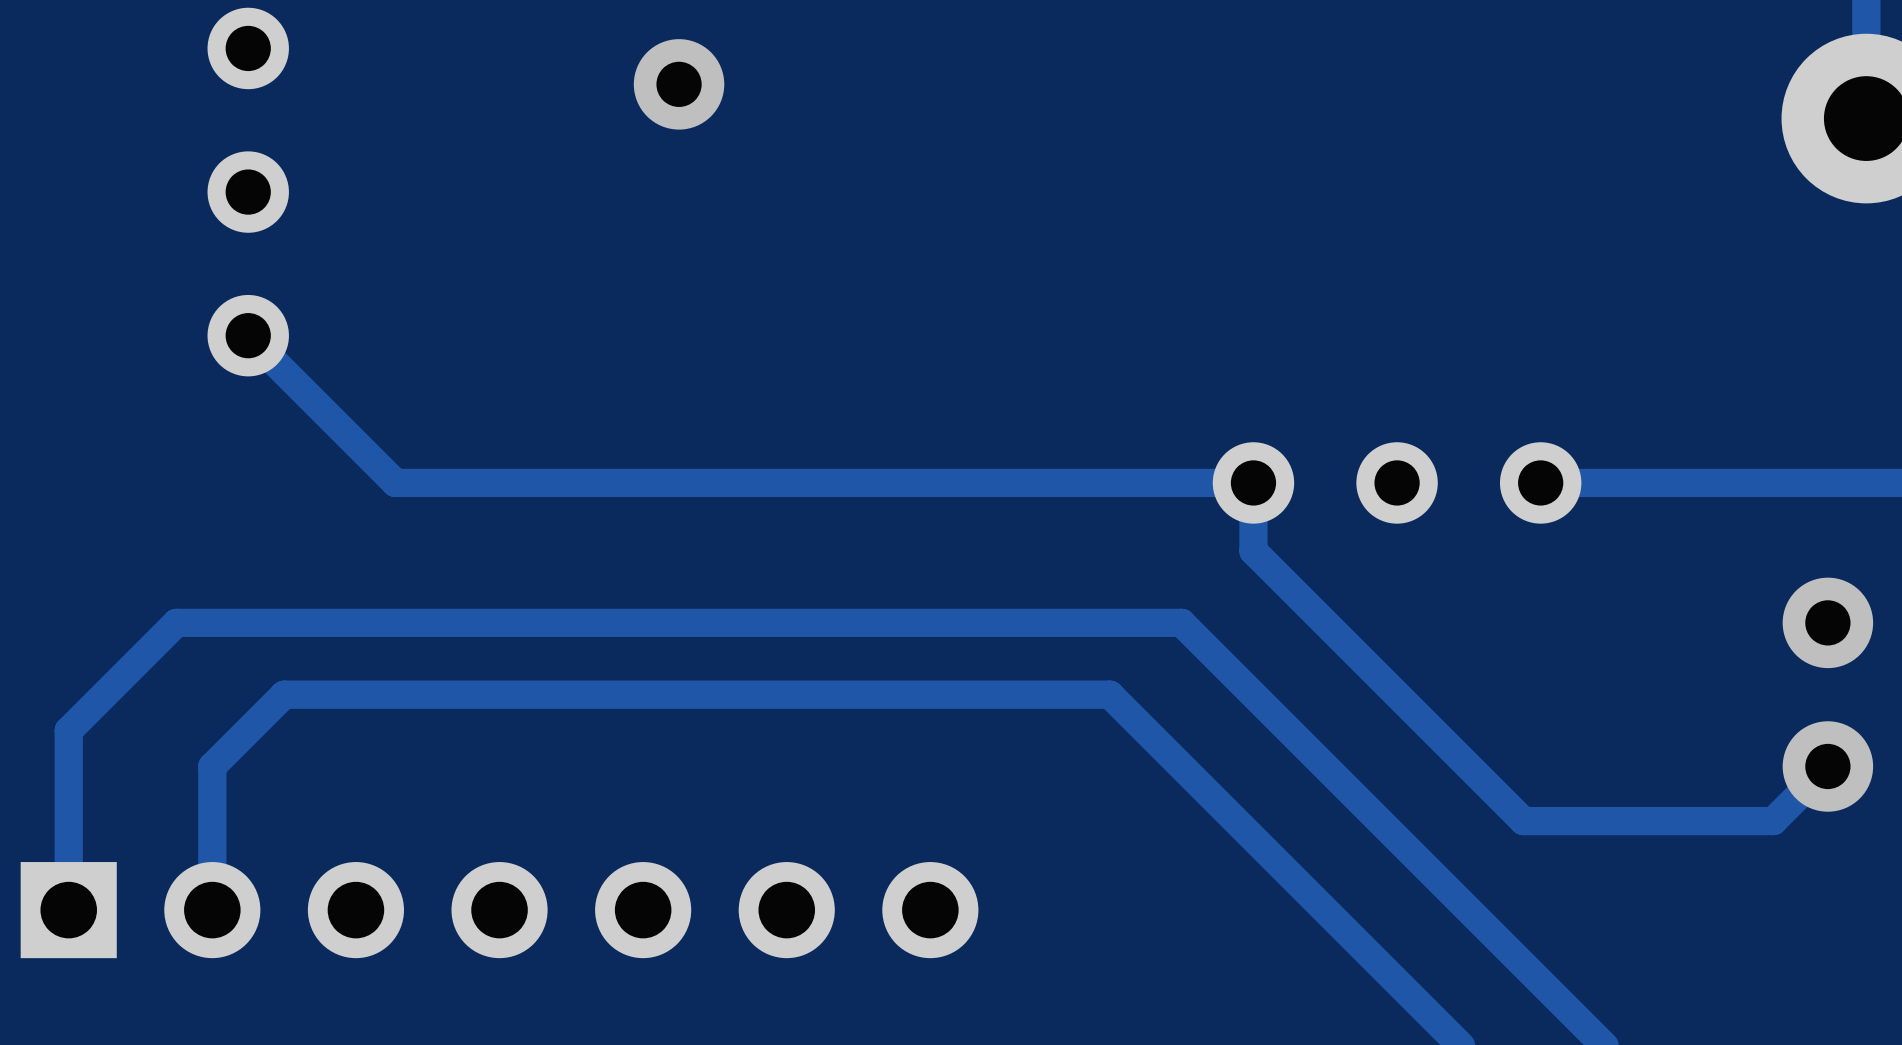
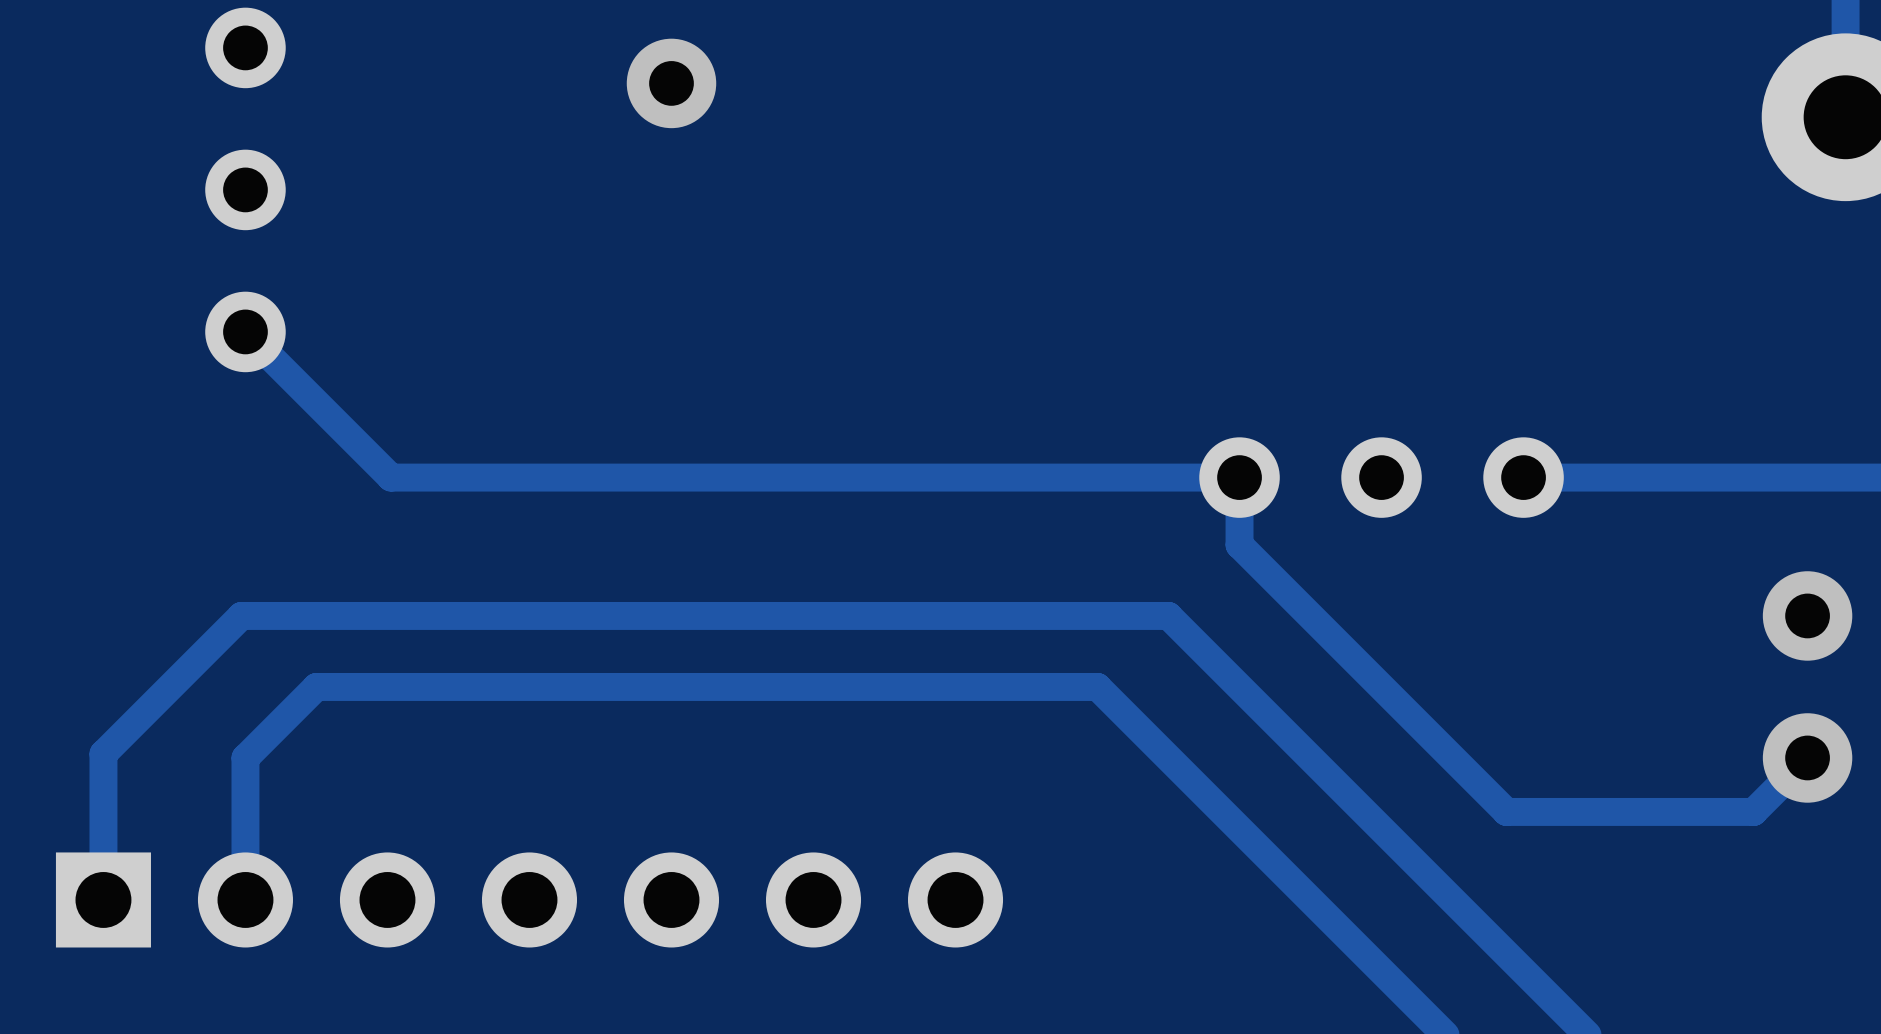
track: (244, 622) (176, 622) (68, 730) (68, 910) -> (241, 615) (103, 753) (103, 899)
track: (320, 694) (284, 694) (212, 766) (212, 910) -> (316, 686) (245, 757) (245, 899)
part position: (499, 910) -> (529, 899)

